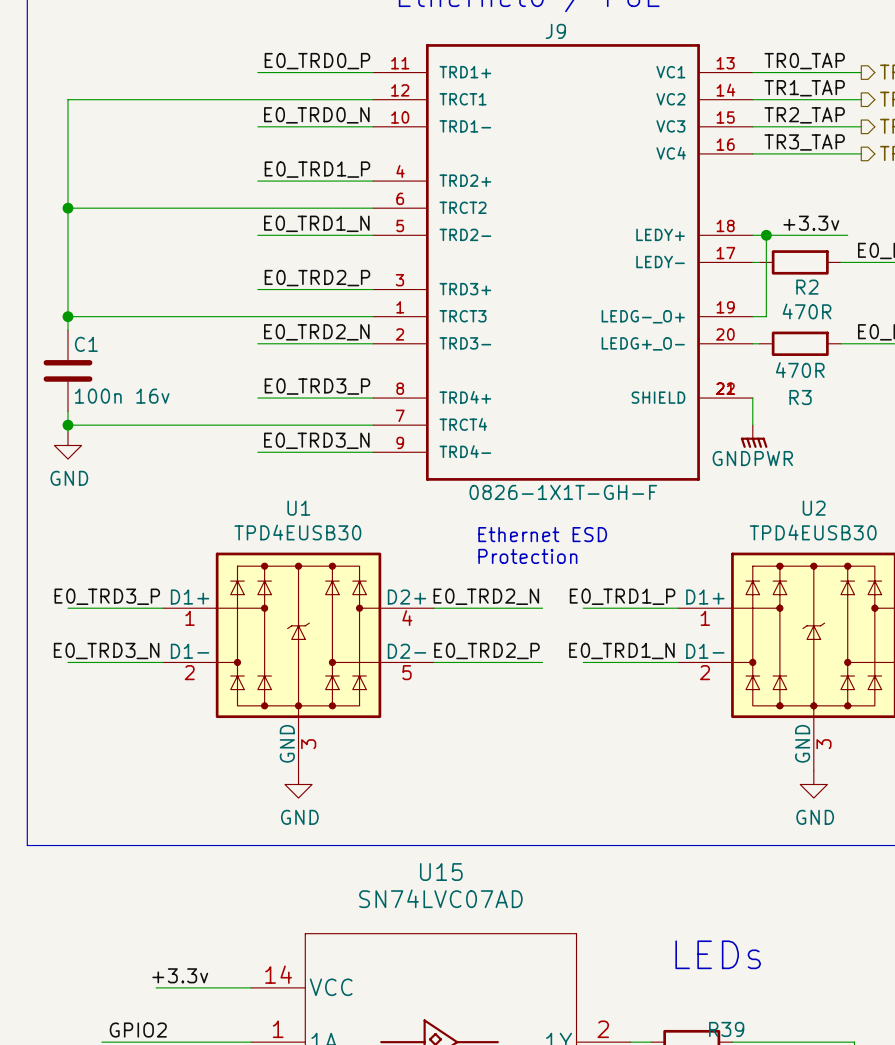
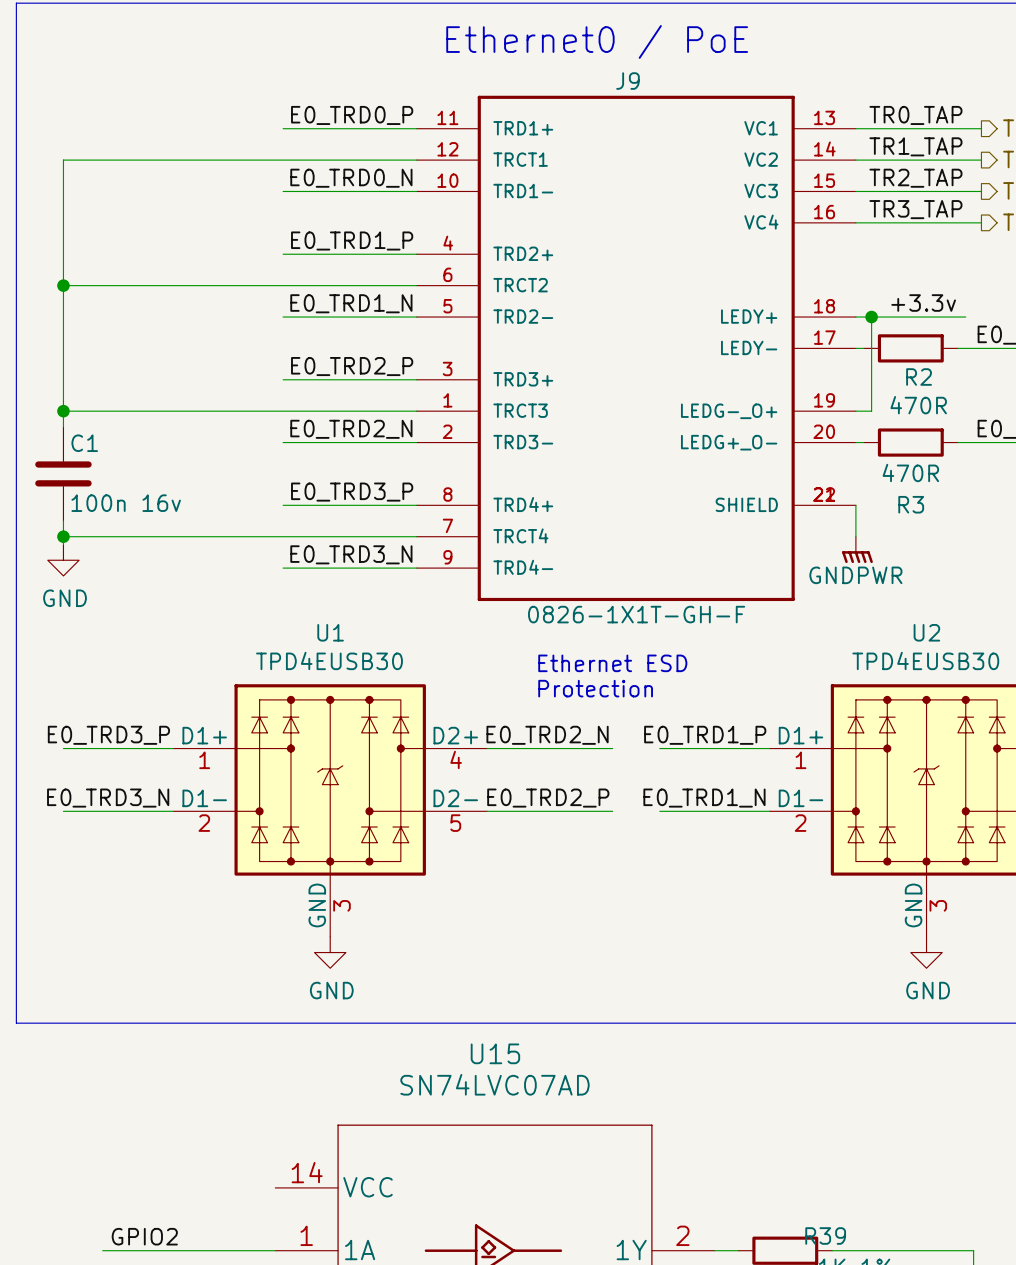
text: LEDs (718, 954) -> none
label: +3.3v (180, 975) -> none
wire: (156, 987) (251, 987) -> none

